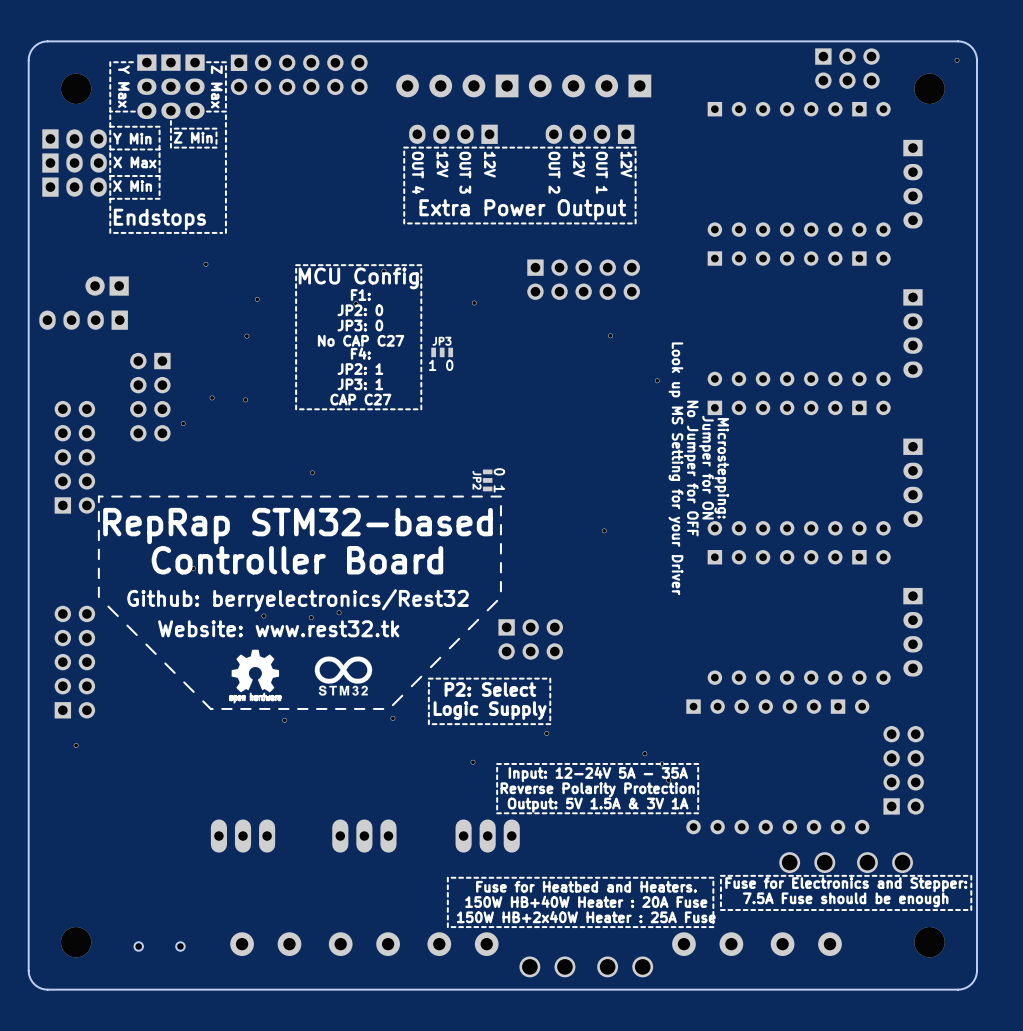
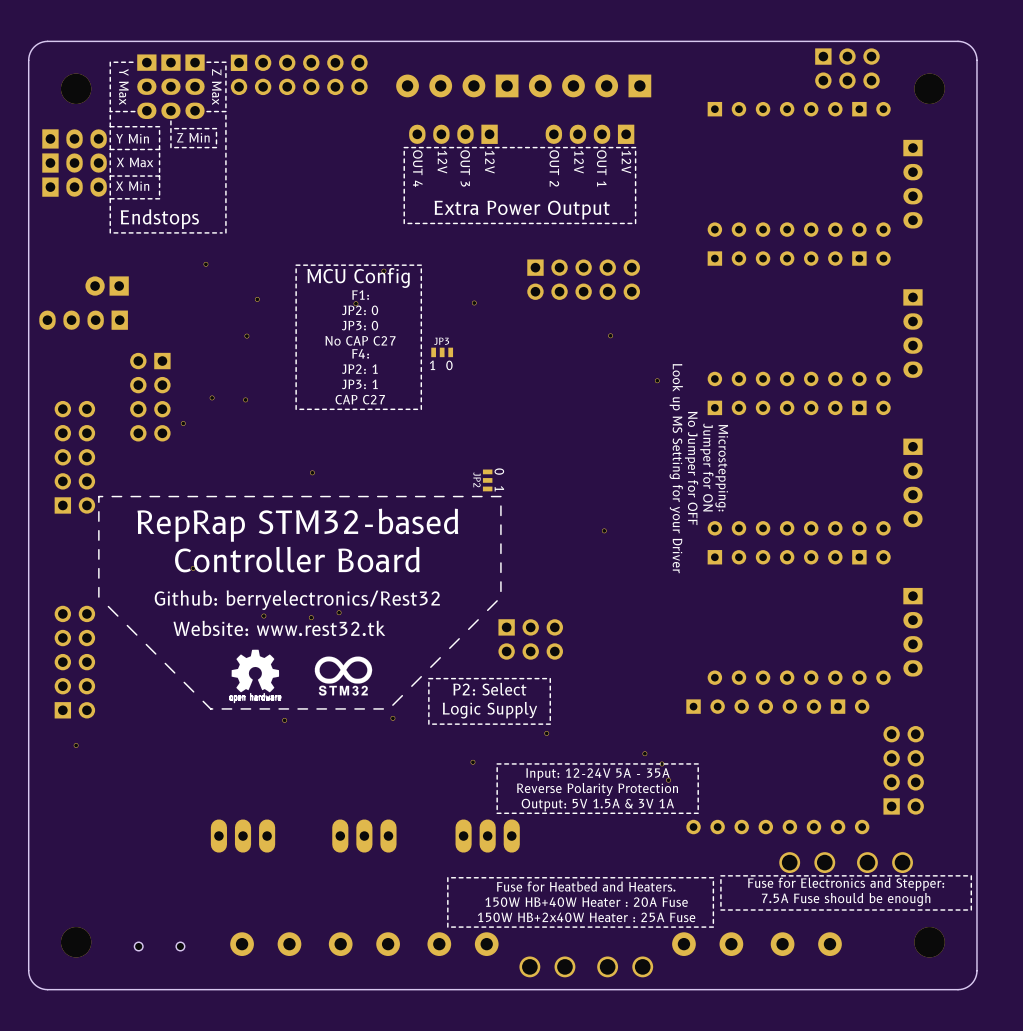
part: (957, 60) -> none

